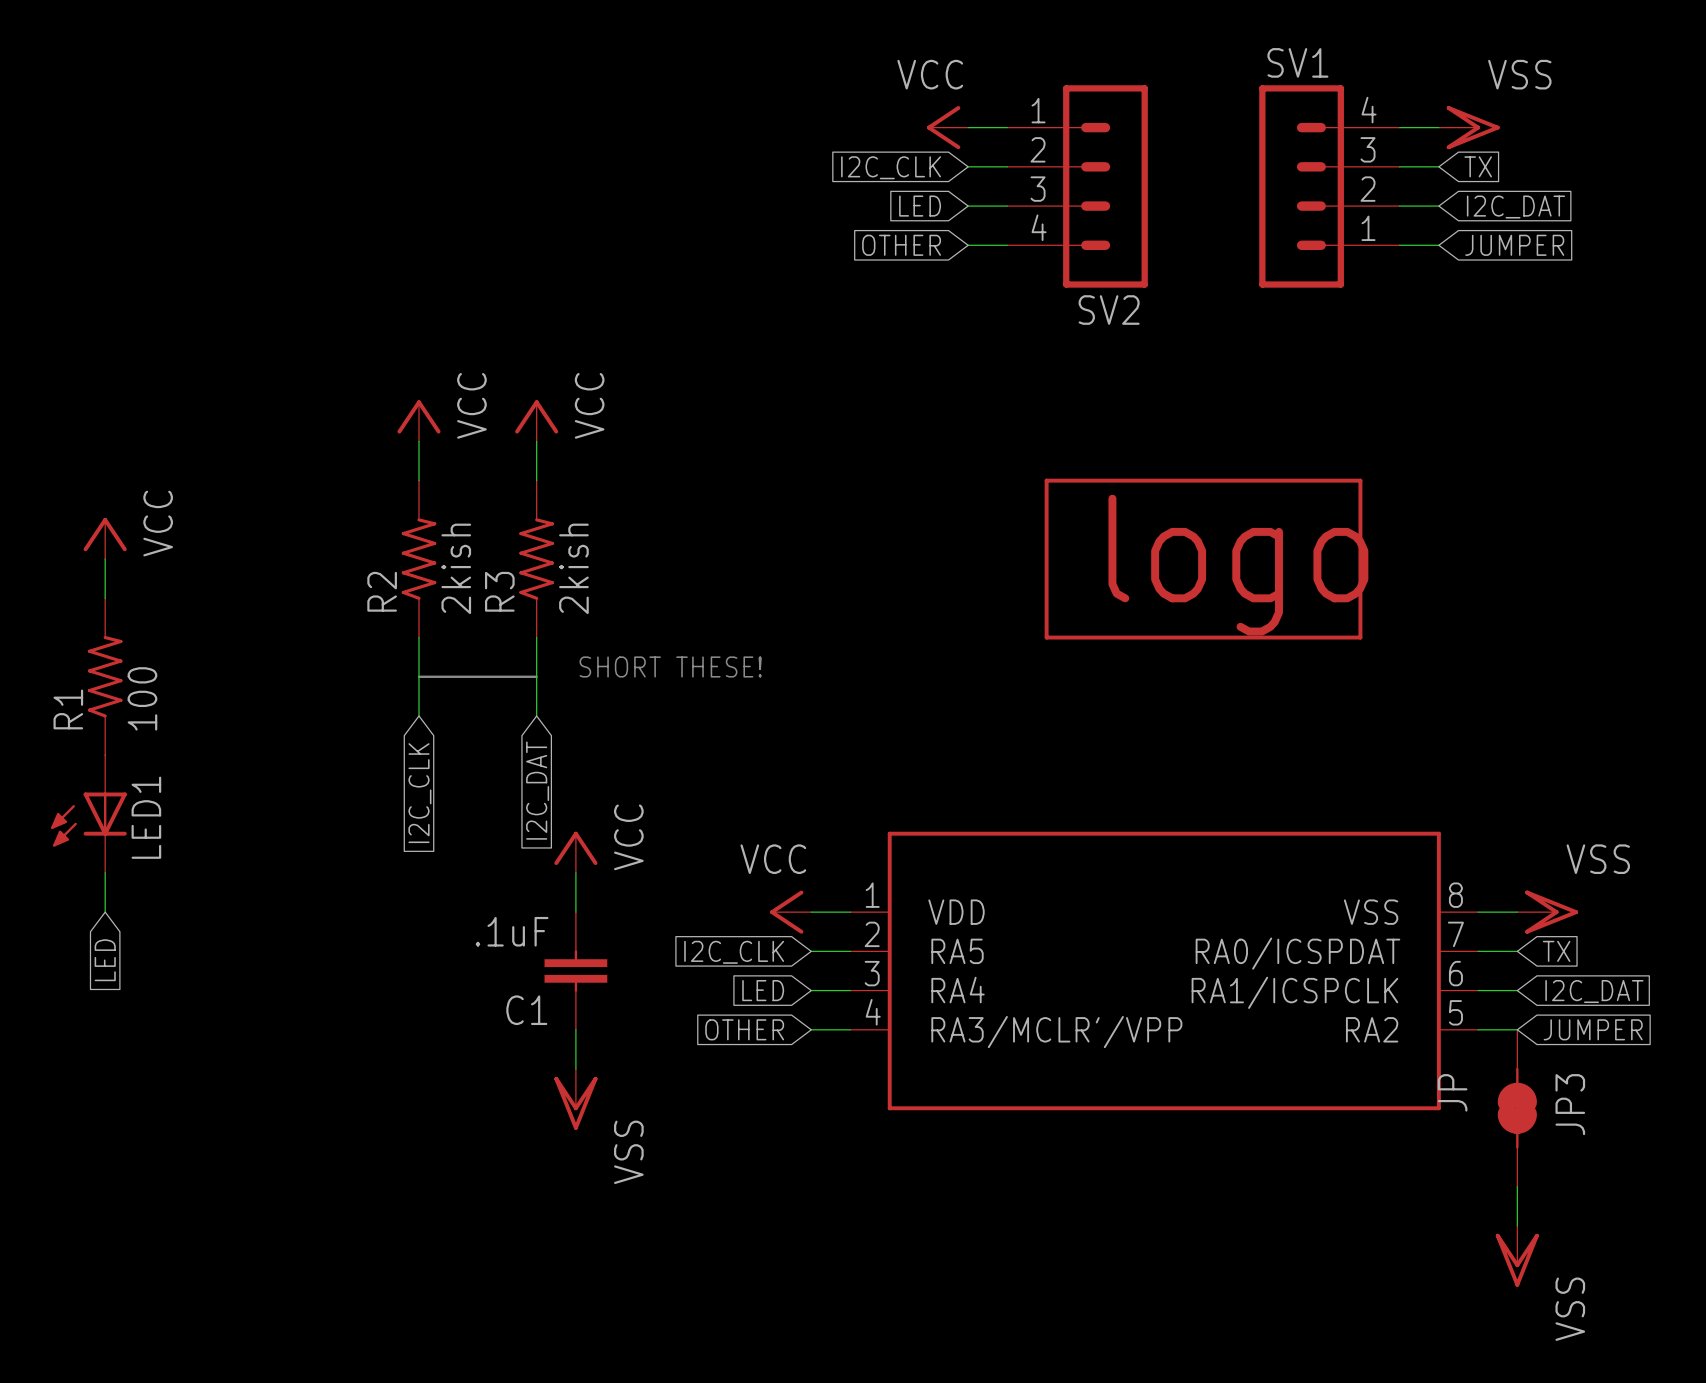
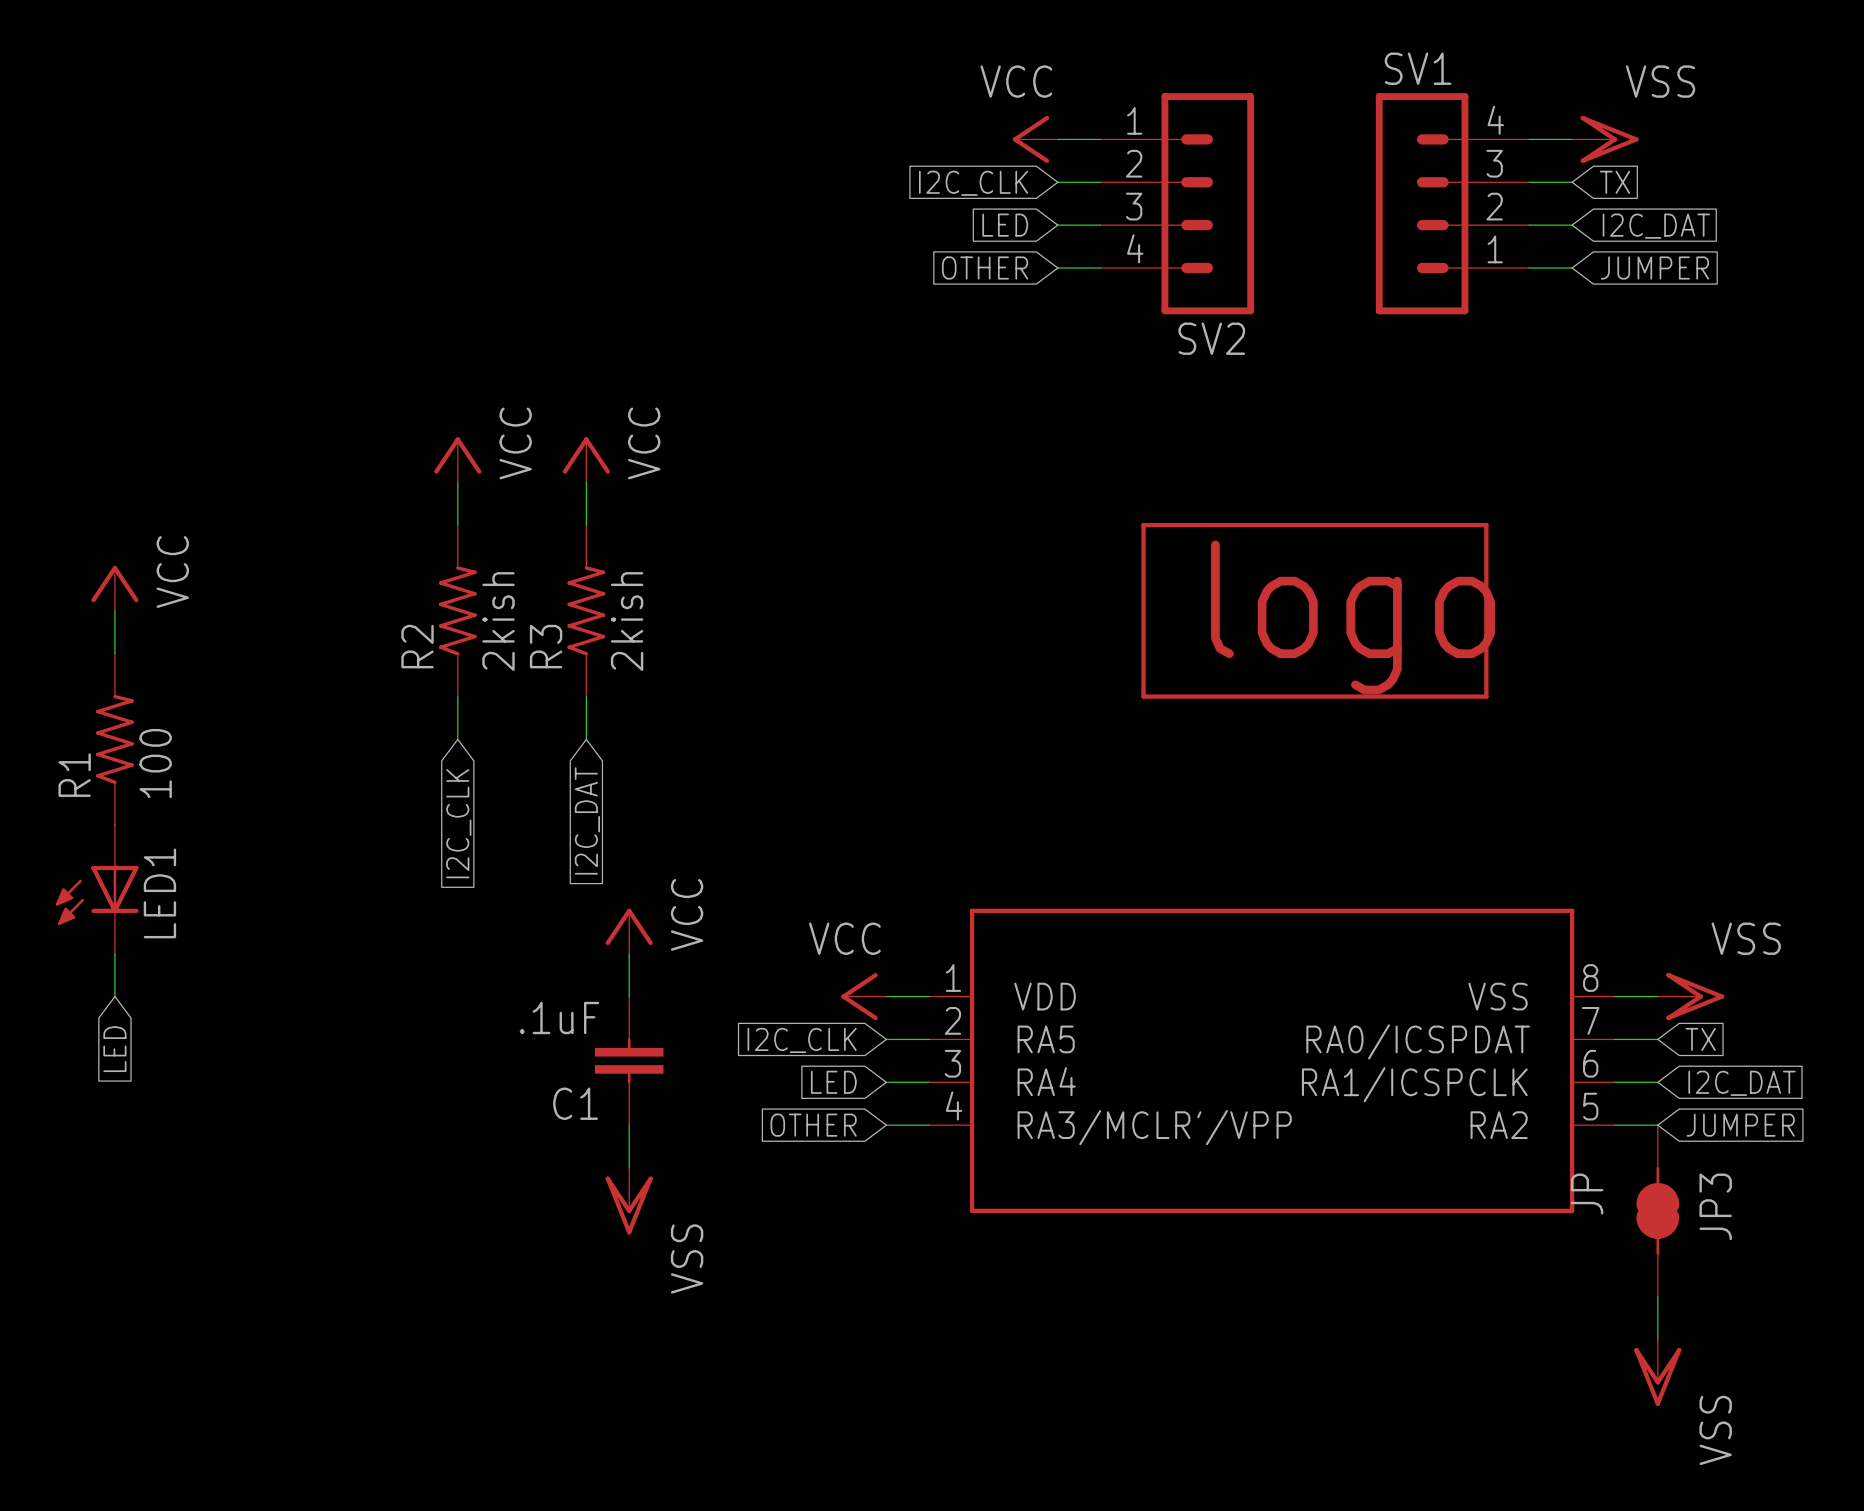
text: SHORT THESE! (670, 666) -> none
line: (419, 676) (536, 676) -> none
wire: (419, 676) (419, 716) -> none
wire: (536, 676) (536, 716) -> none
global label position: I2C_DAT (537, 790) -> I2C_DAT (587, 820)
global label position: I2C_CLK (419, 793) -> I2C_CLK (458, 823)

